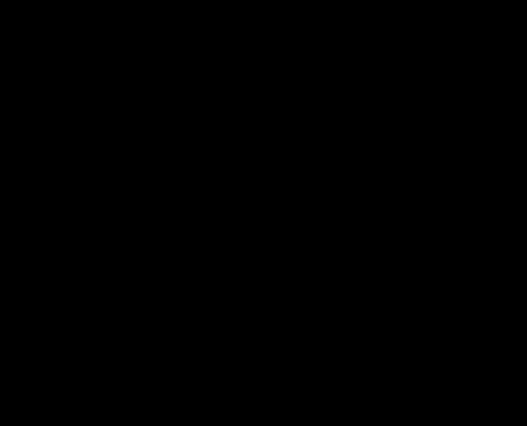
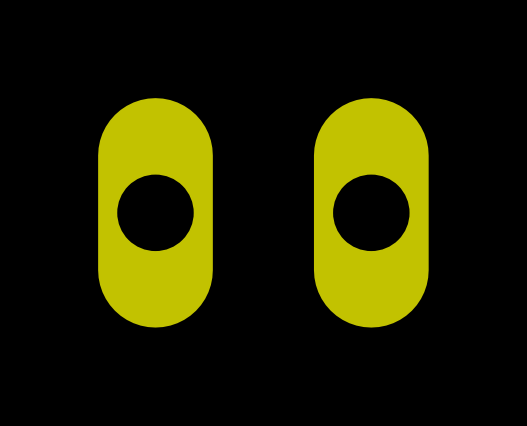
part: none -> (263, 212)

